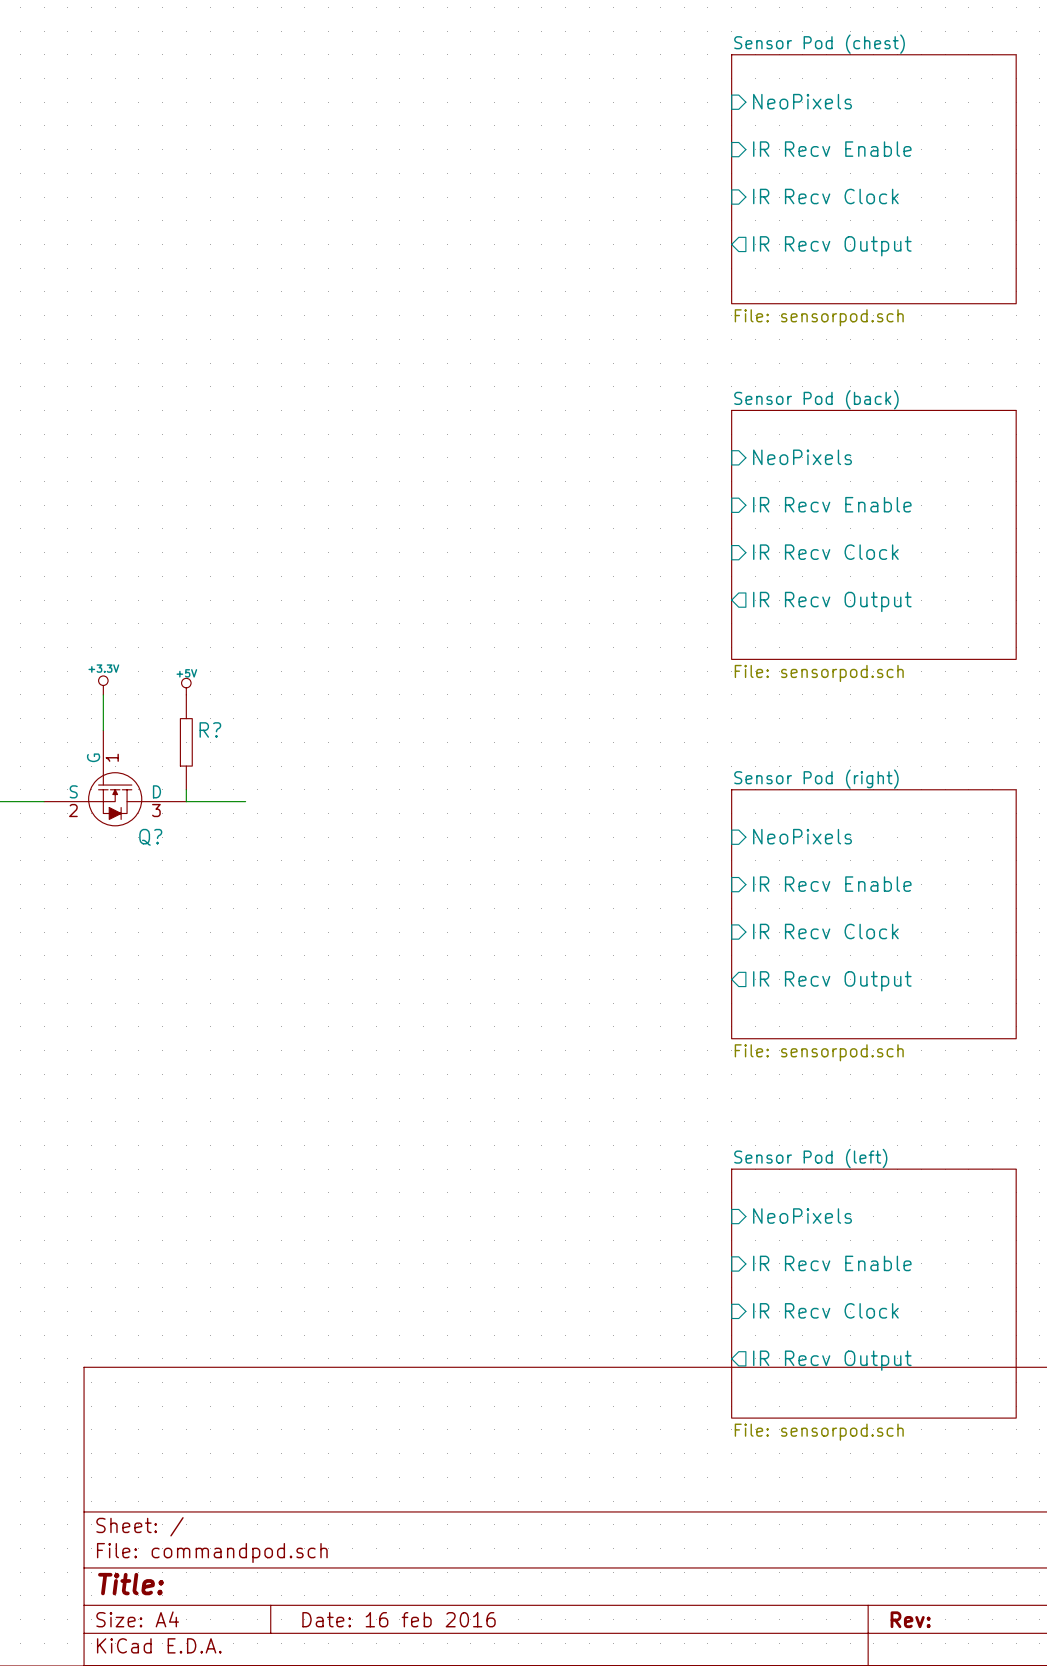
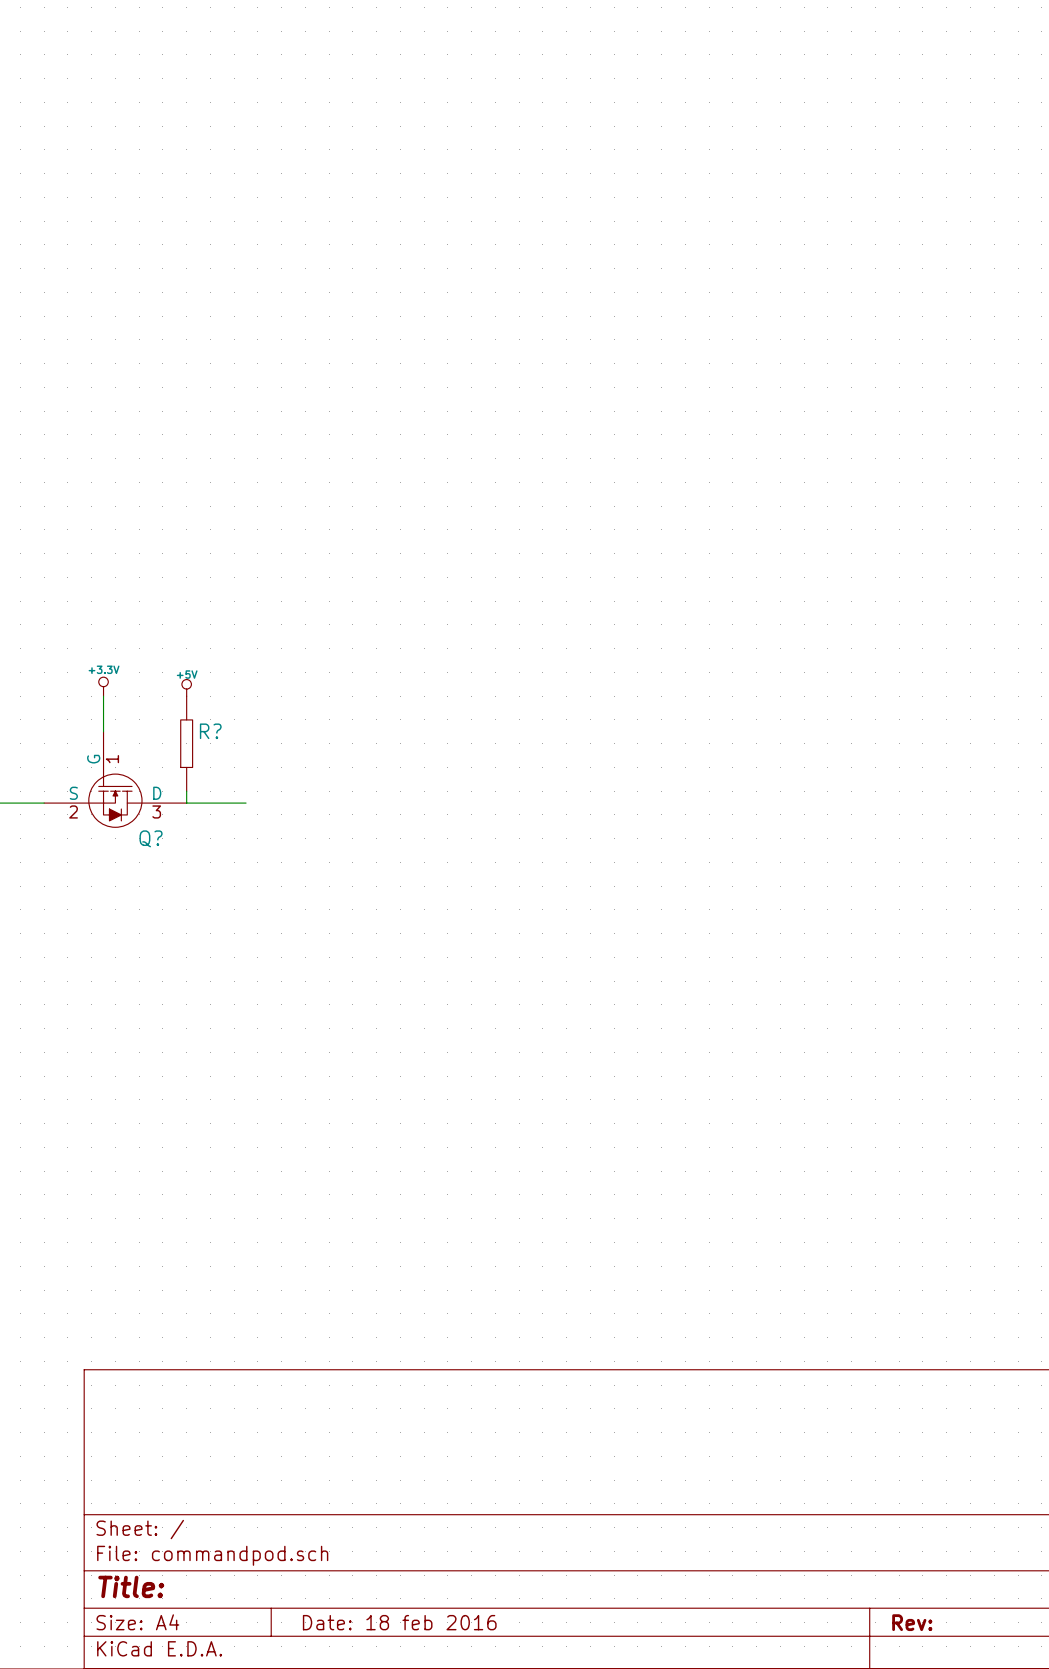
sheet pin: NeoPixels (802, 101) -> none
sheet pin: IR Recv Enable (832, 149) -> none
sheet Sensor Pod (chest): File: sensorpod.sch (873, 179) -> none
sheet pin: IR Recv Clock (825, 196) -> none
sheet pin: IR Recv Output (832, 246) -> none
sheet pin: NeoPixels (802, 457) -> none
sheet pin: IR Recv Enable (832, 504) -> none
sheet Sensor Pod (back): File: sensorpod.sch (873, 534) -> none
sheet pin: IR Recv Clock (825, 552) -> none
sheet pin: IR Recv Output (832, 601) -> none
sheet pin: NeoPixels (802, 836) -> none
sheet pin: IR Recv Enable (832, 884) -> none
sheet Sensor Pod (right): File: sensorpod.sch (873, 914) -> none
sheet pin: IR Recv Clock (825, 931) -> none
sheet pin: IR Recv Output (832, 981) -> none
sheet pin: NeoPixels (802, 1216) -> none
sheet pin: IR Recv Enable (832, 1263) -> none
sheet Sensor Pod (left): File: sensorpod.sch (873, 1293) -> none
sheet pin: IR Recv Clock (825, 1310) -> none
sheet pin: IR Recv Output (832, 1360) -> none
title block: Date: 16 feb 2016 (399, 1619) -> Date: 18 feb 2016 (399, 1622)

